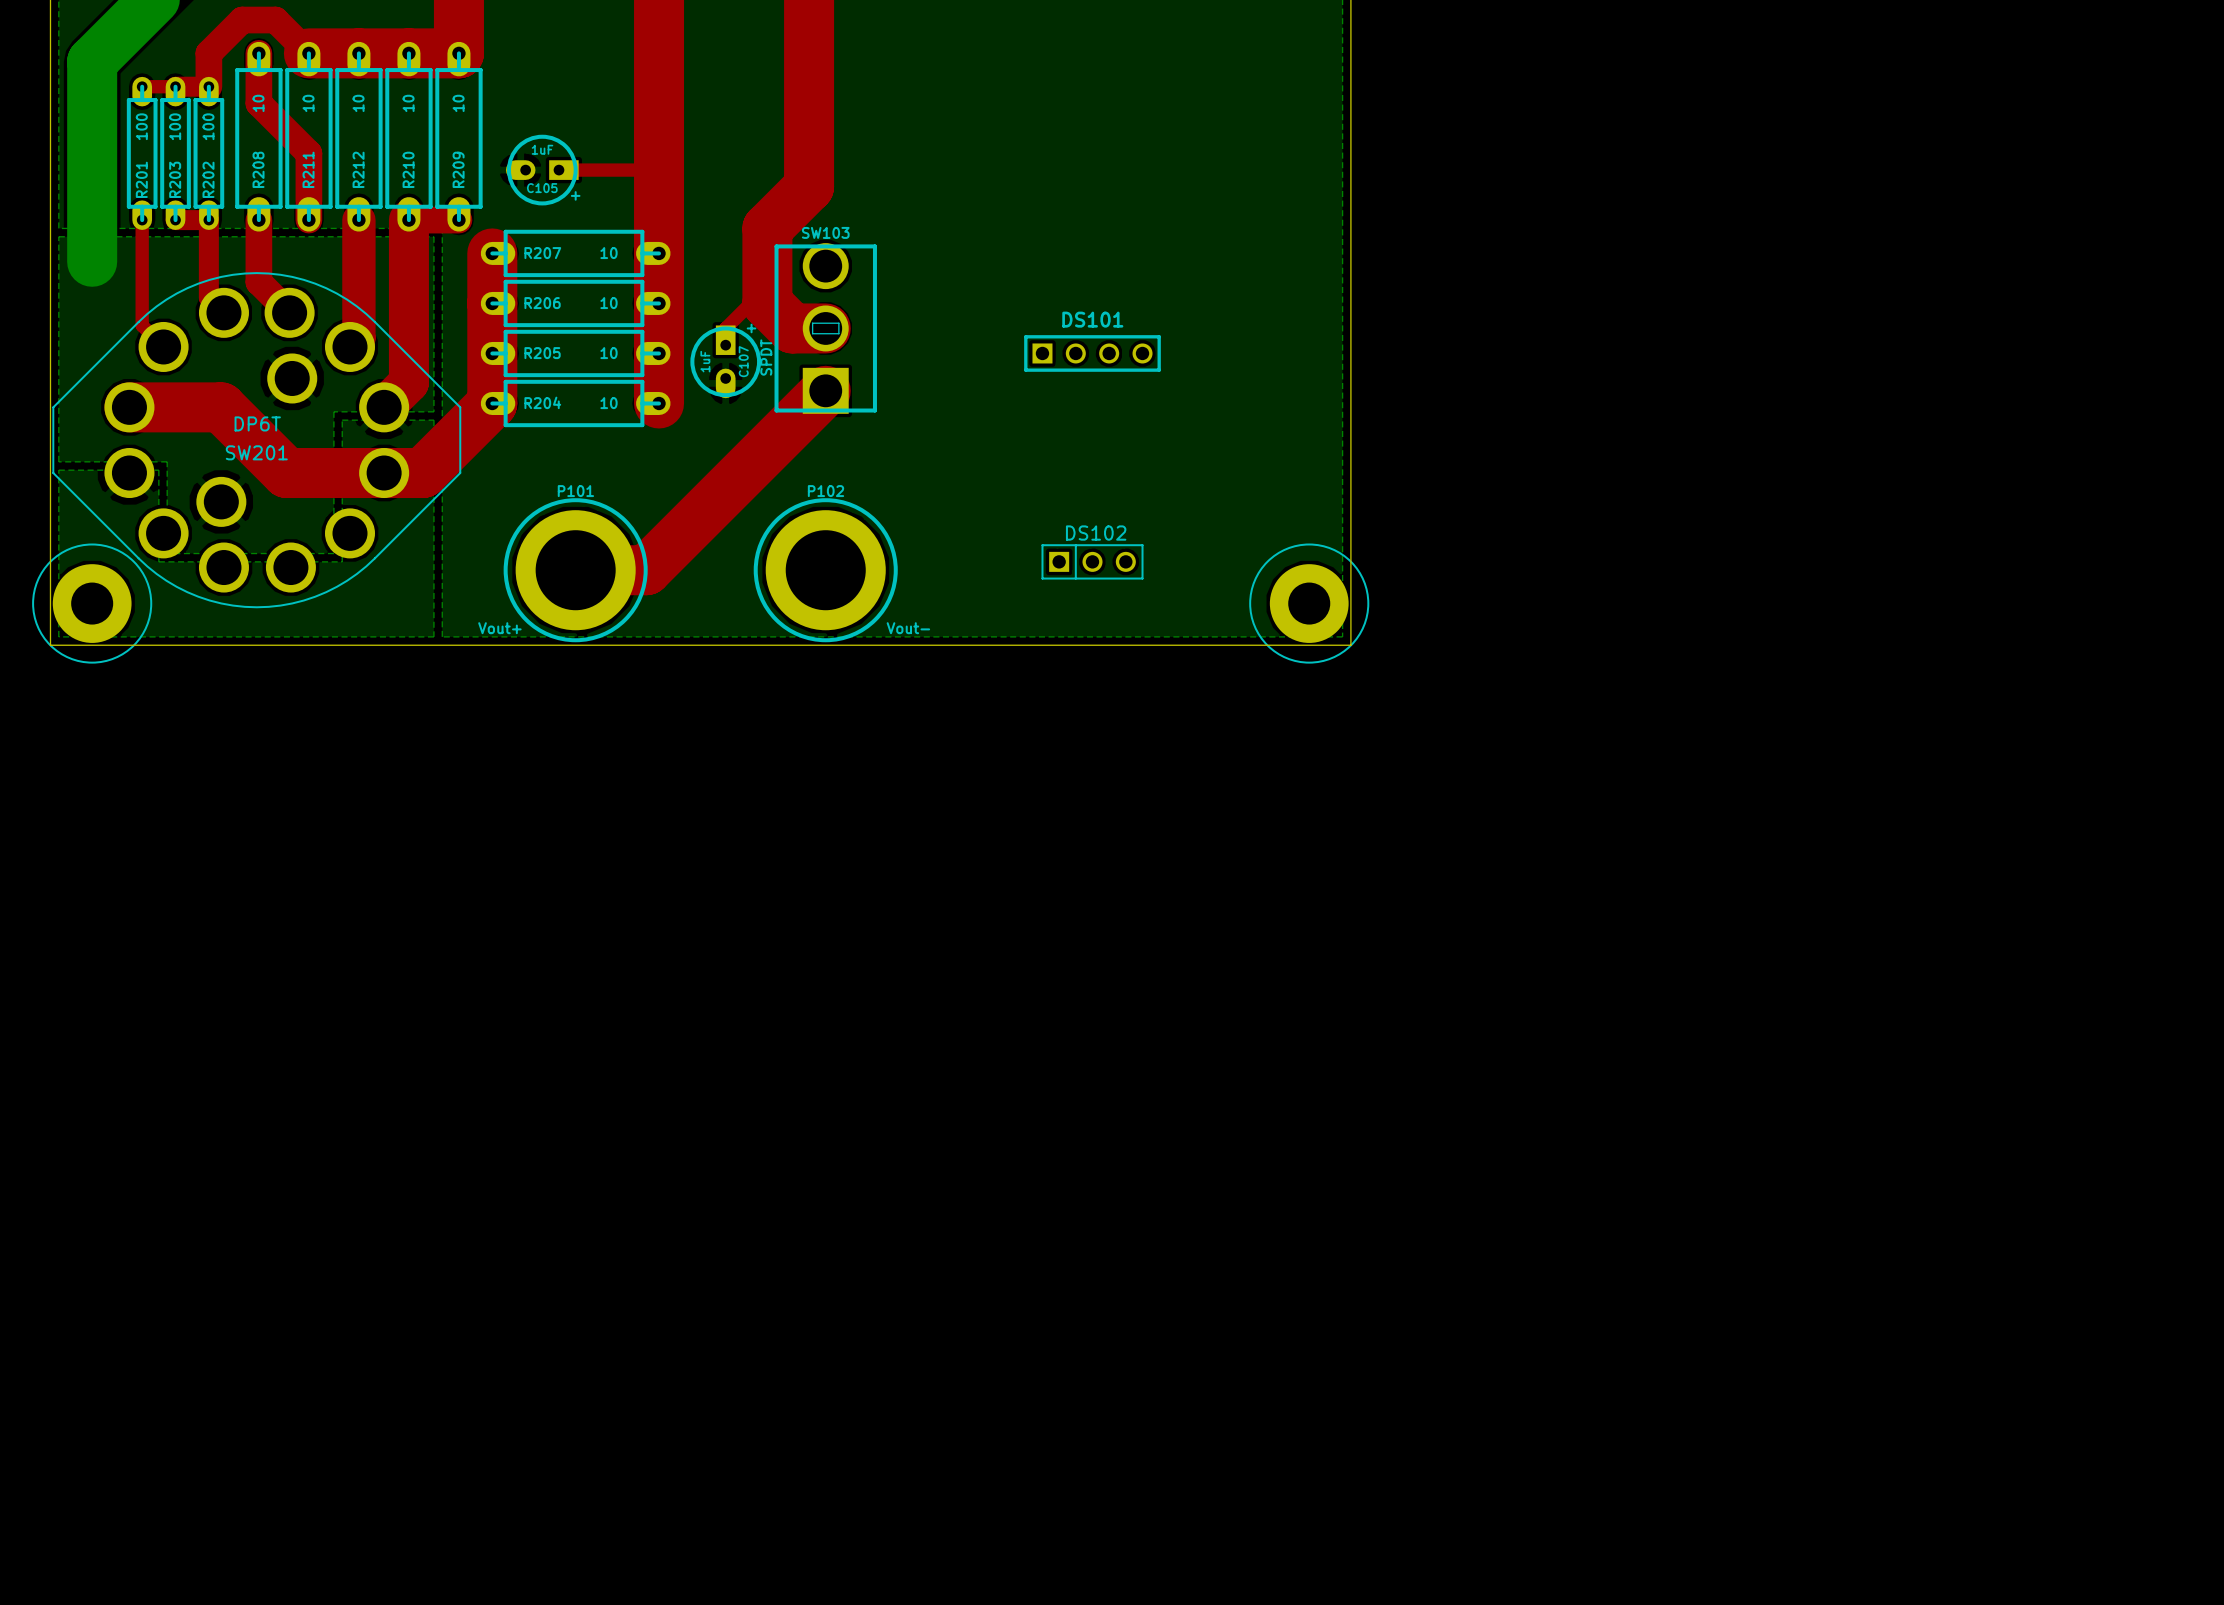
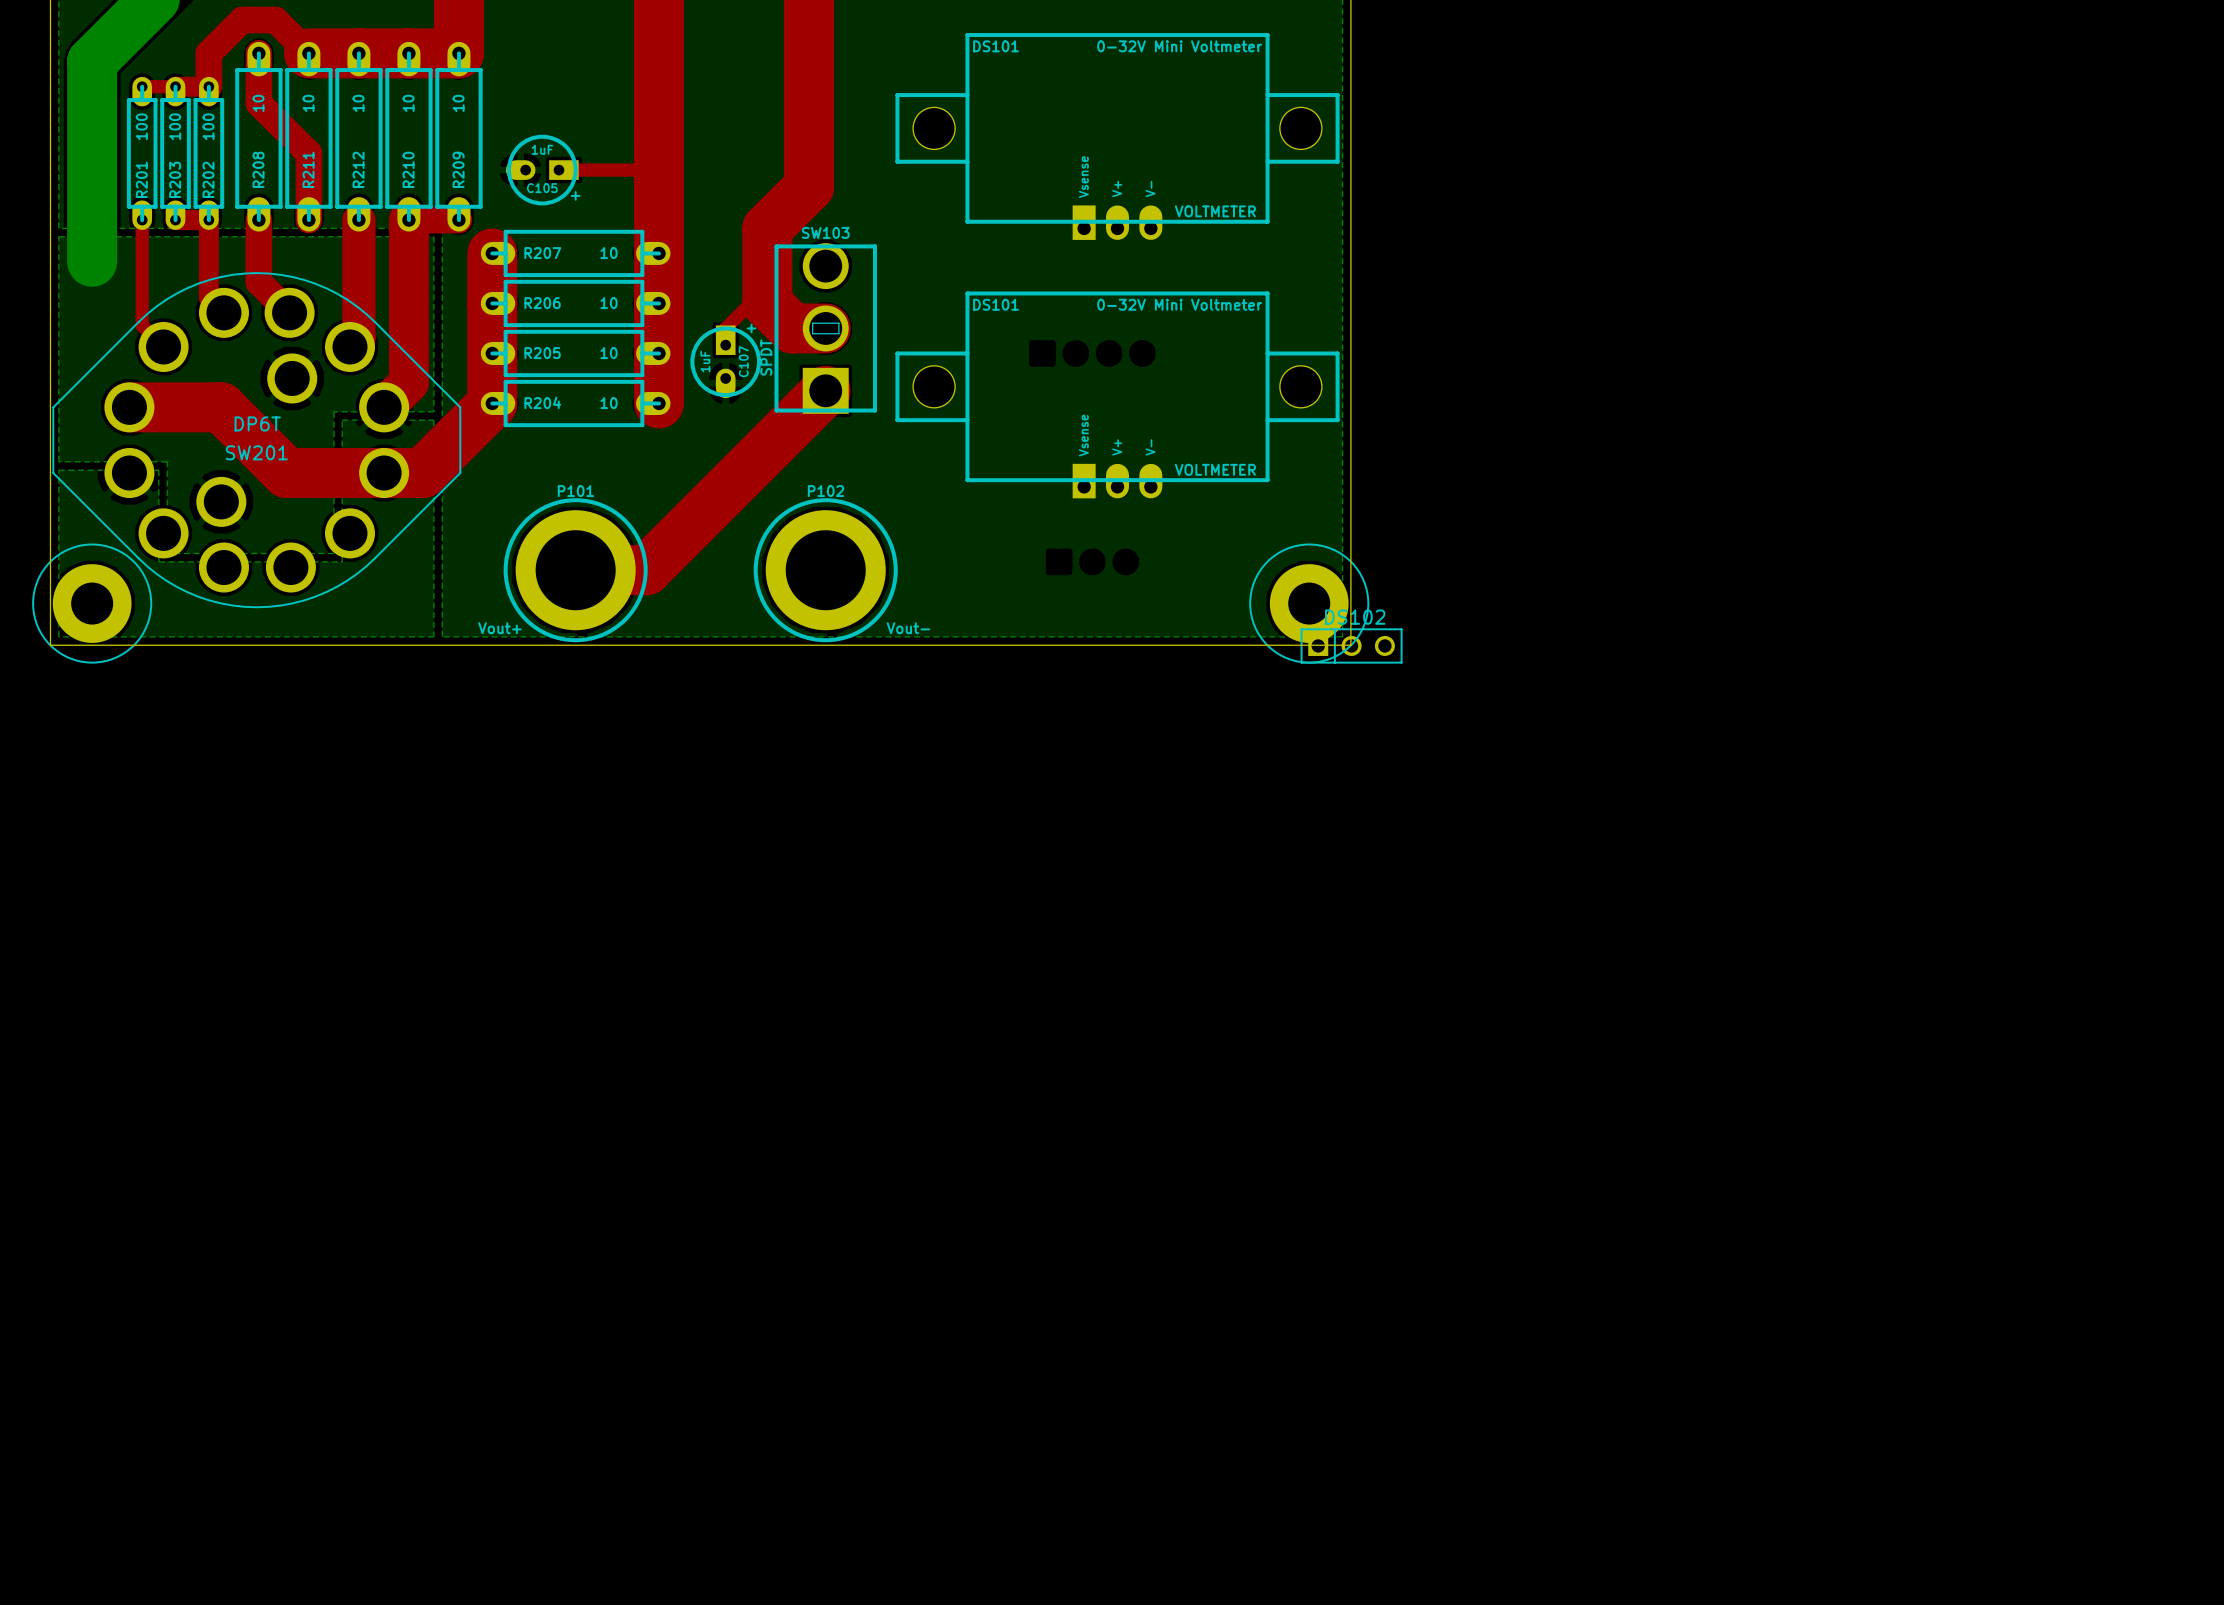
DS101: none -> VOLTMETER (1117, 136)
DS101: (1092, 353) -> none
DS101: none -> VOLTMETER (1117, 394)
DS102 position: (1092, 561) -> (1351, 645)

